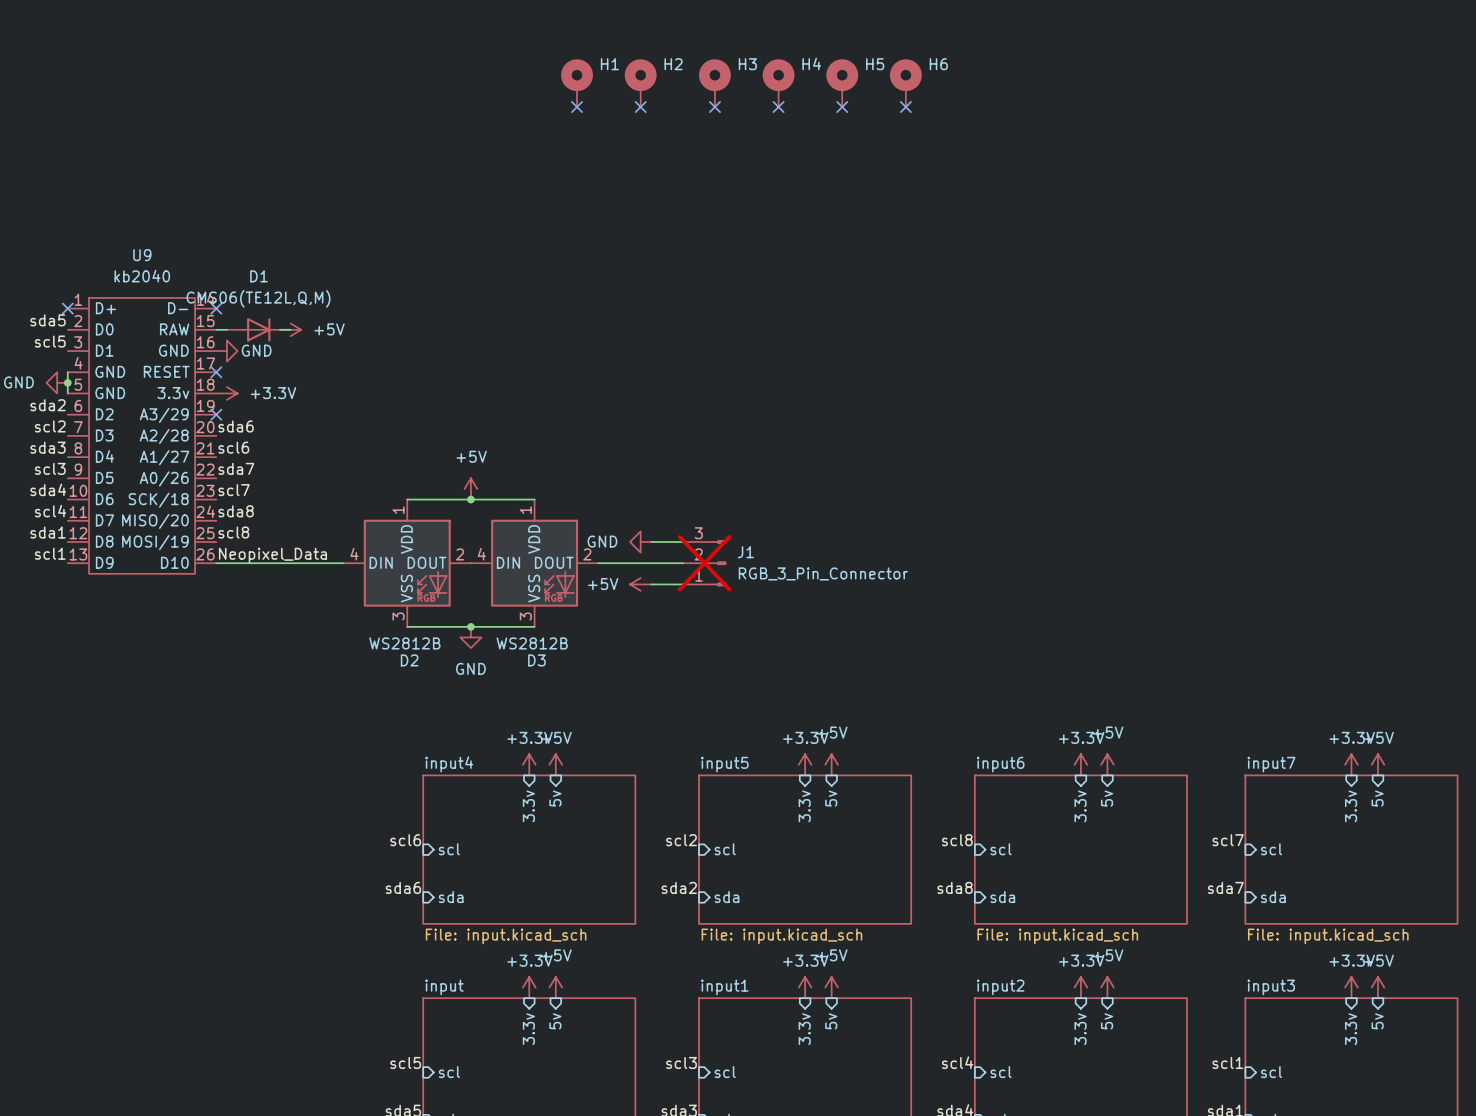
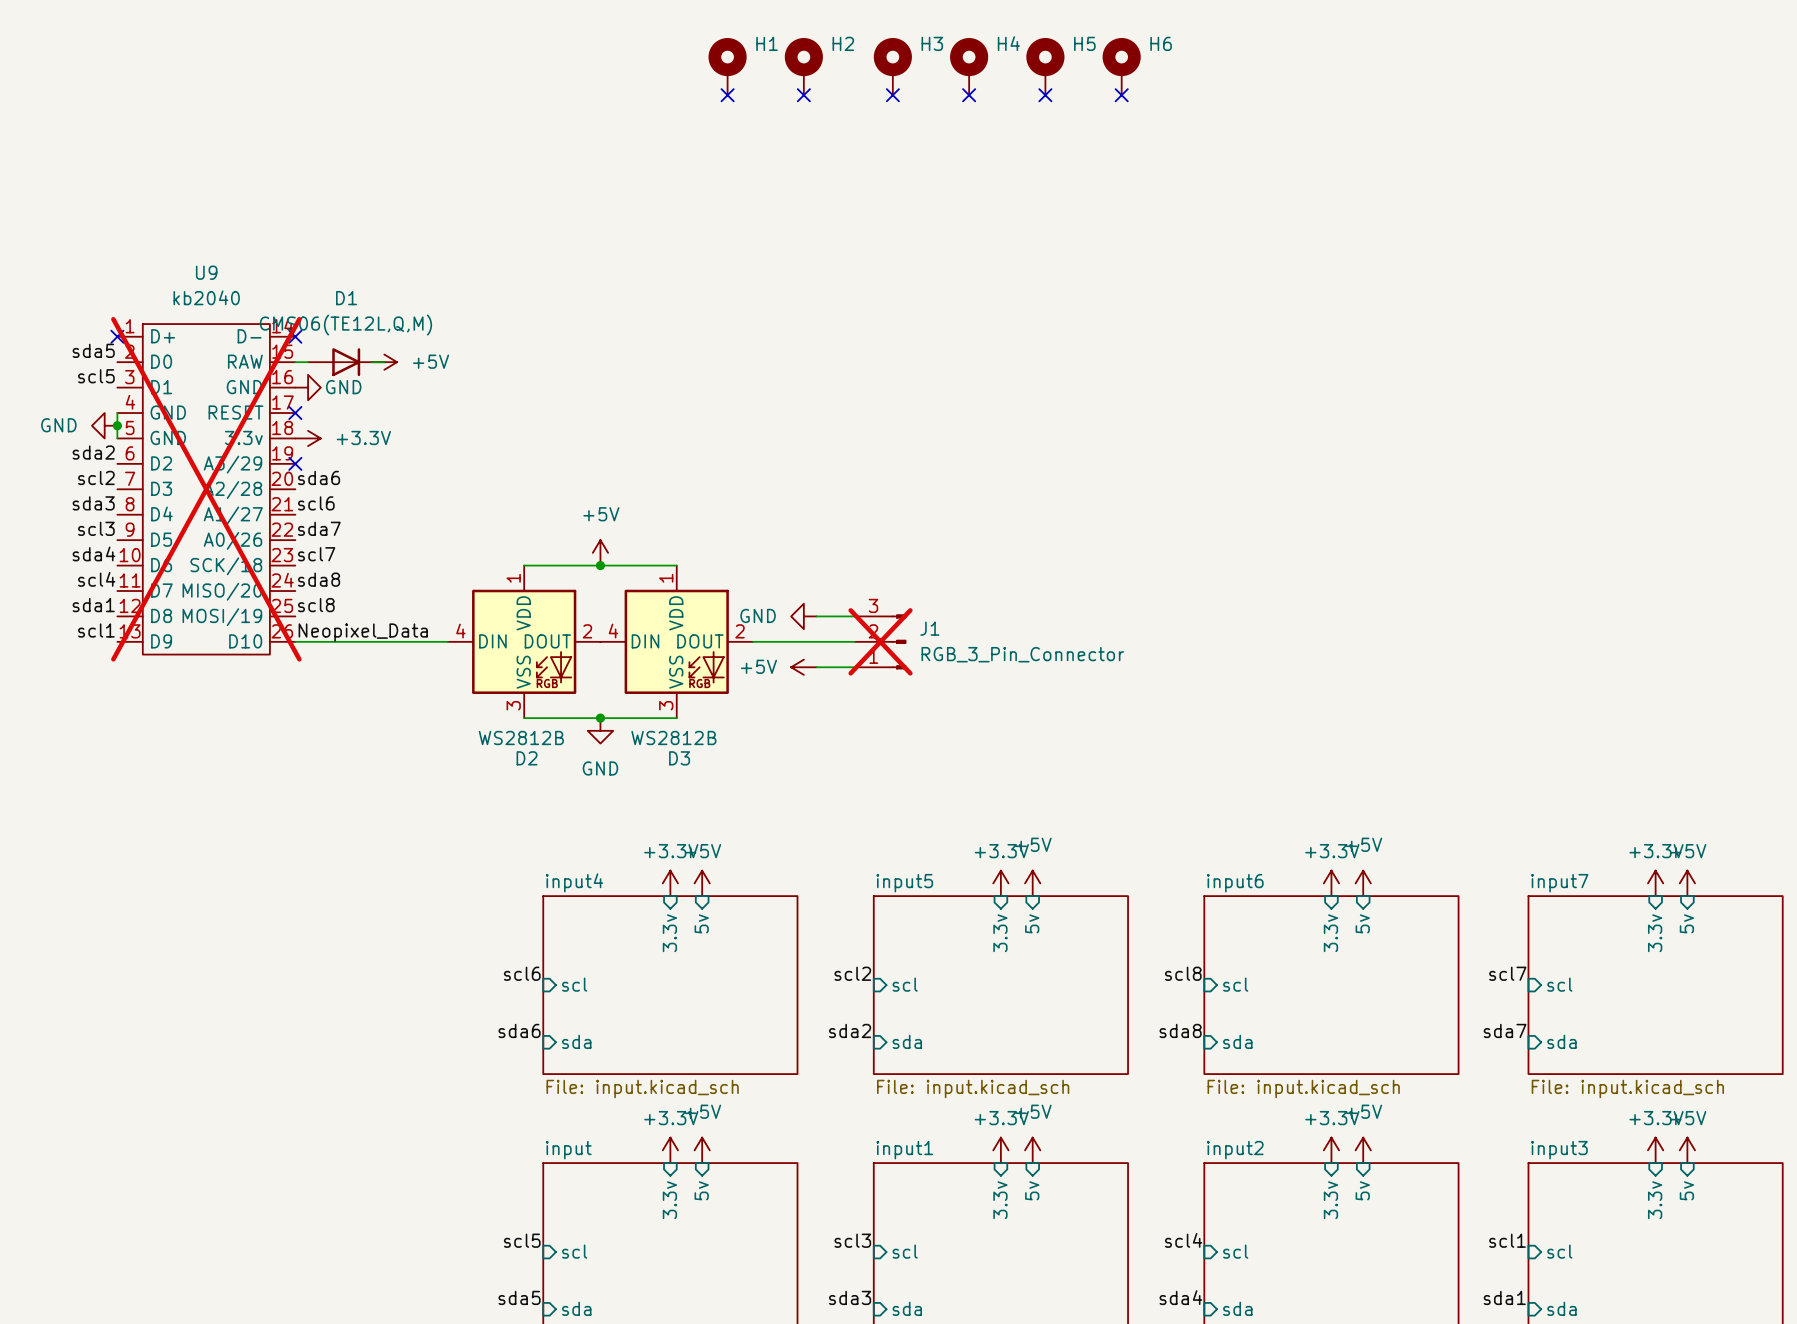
U9 do-not-place cross: none -> (206, 489)

